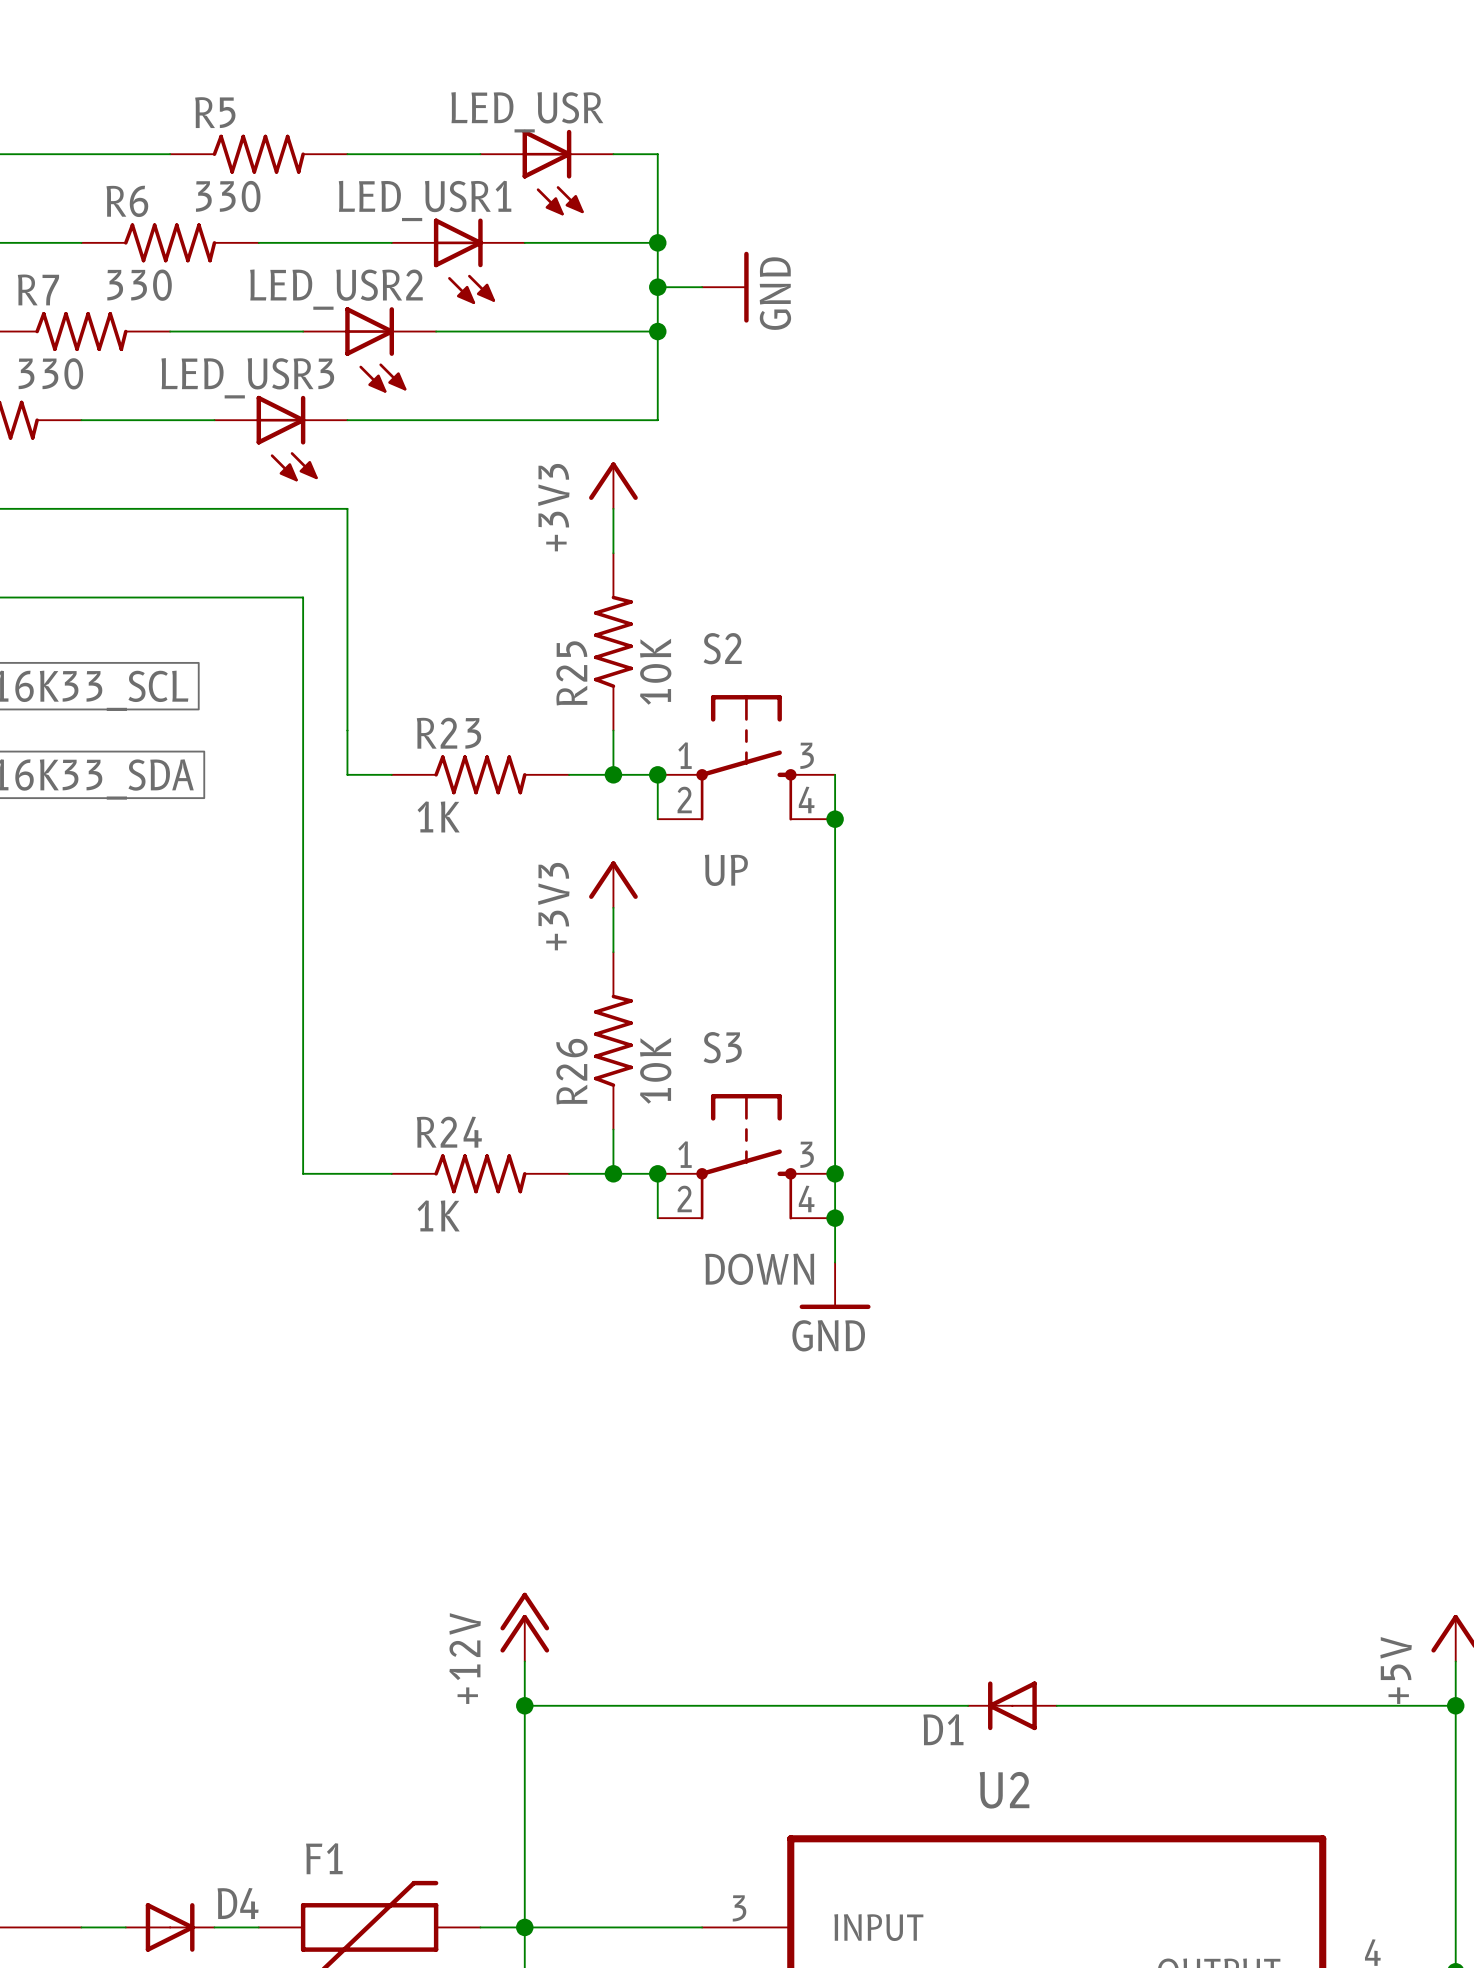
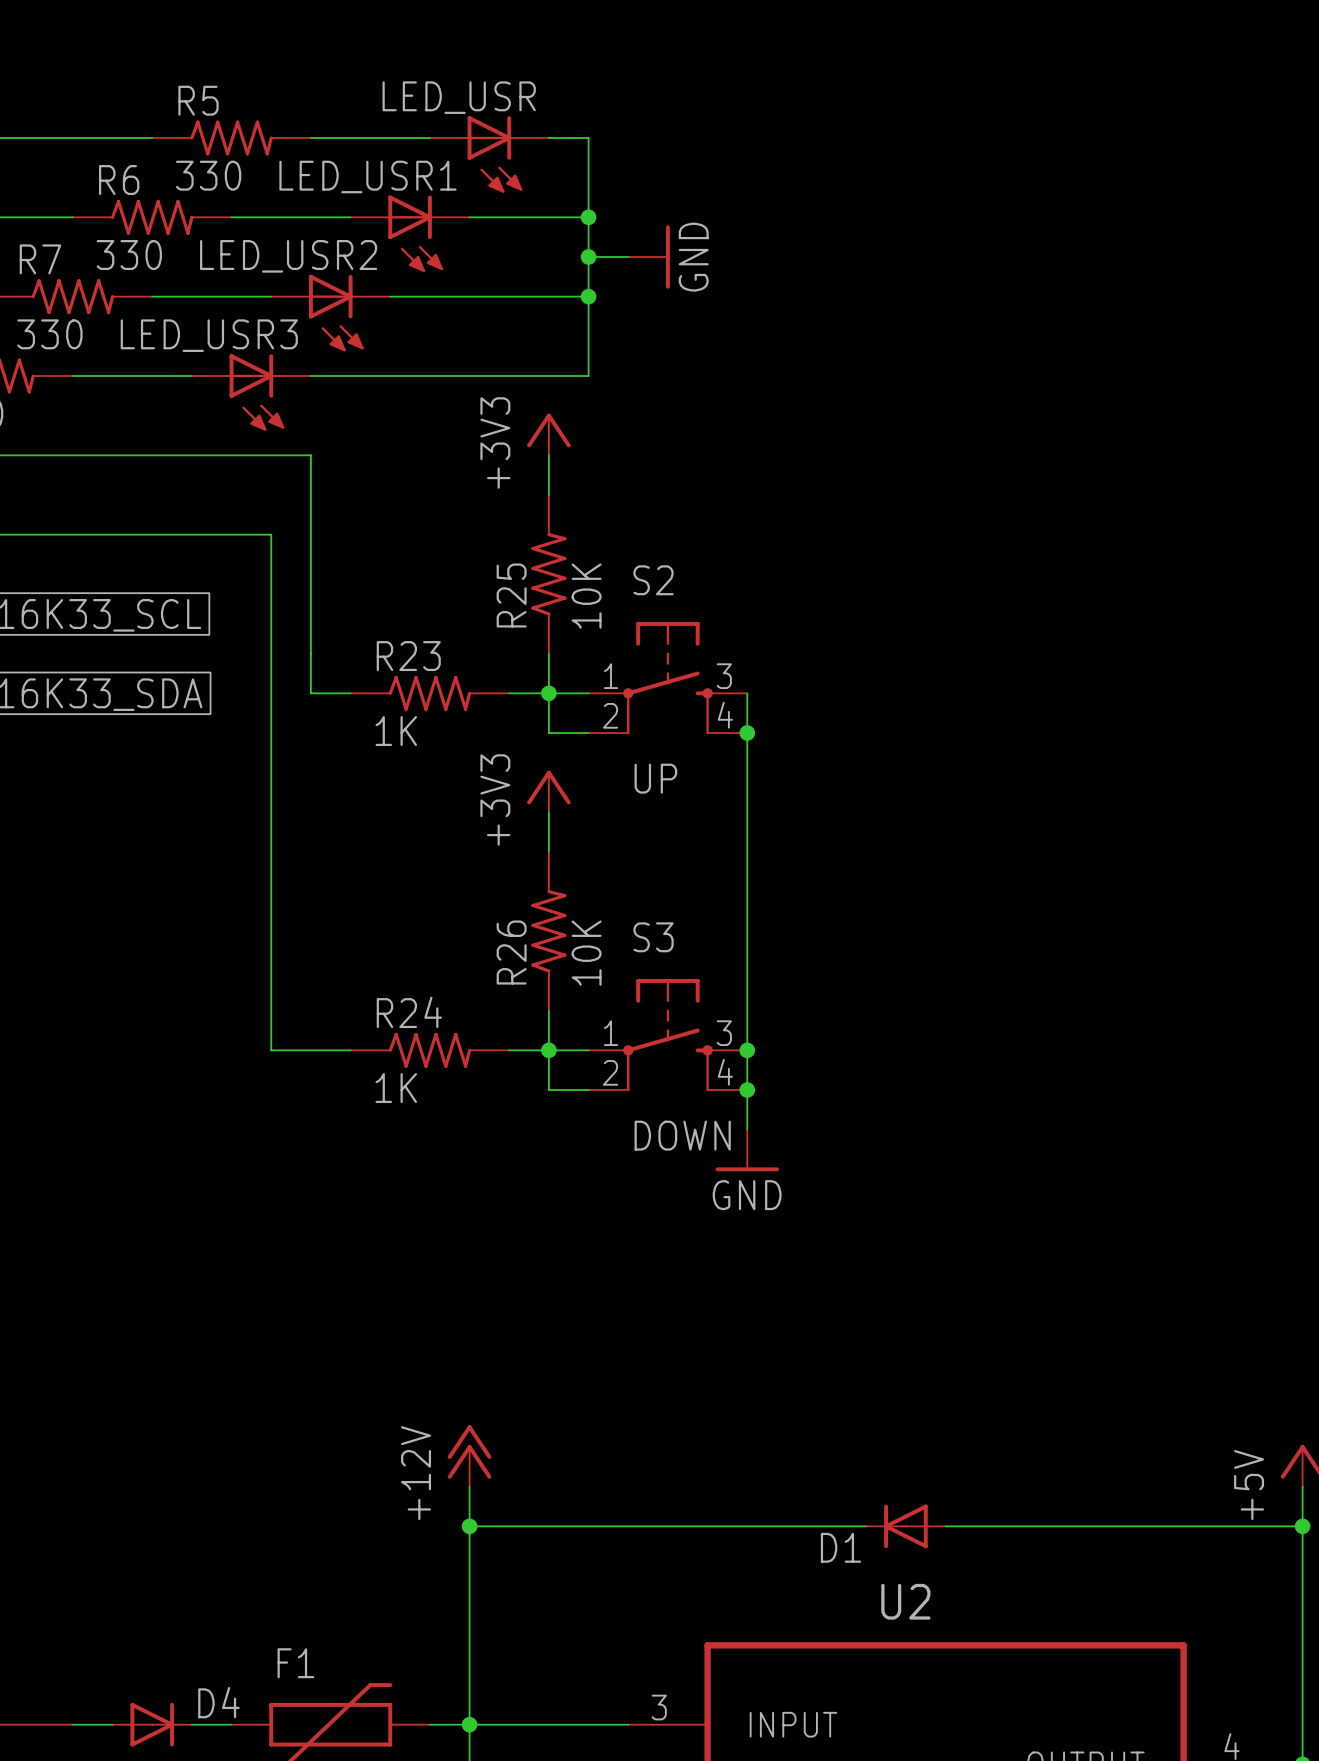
wire: (657, 774) (657, 819) -> (548, 693) (548, 733) (588, 733)
junction: (657, 774) -> none
wire: (657, 1173) (657, 1218) -> (548, 1050) (548, 1090) (588, 1090)
junction: (657, 1173) -> none

